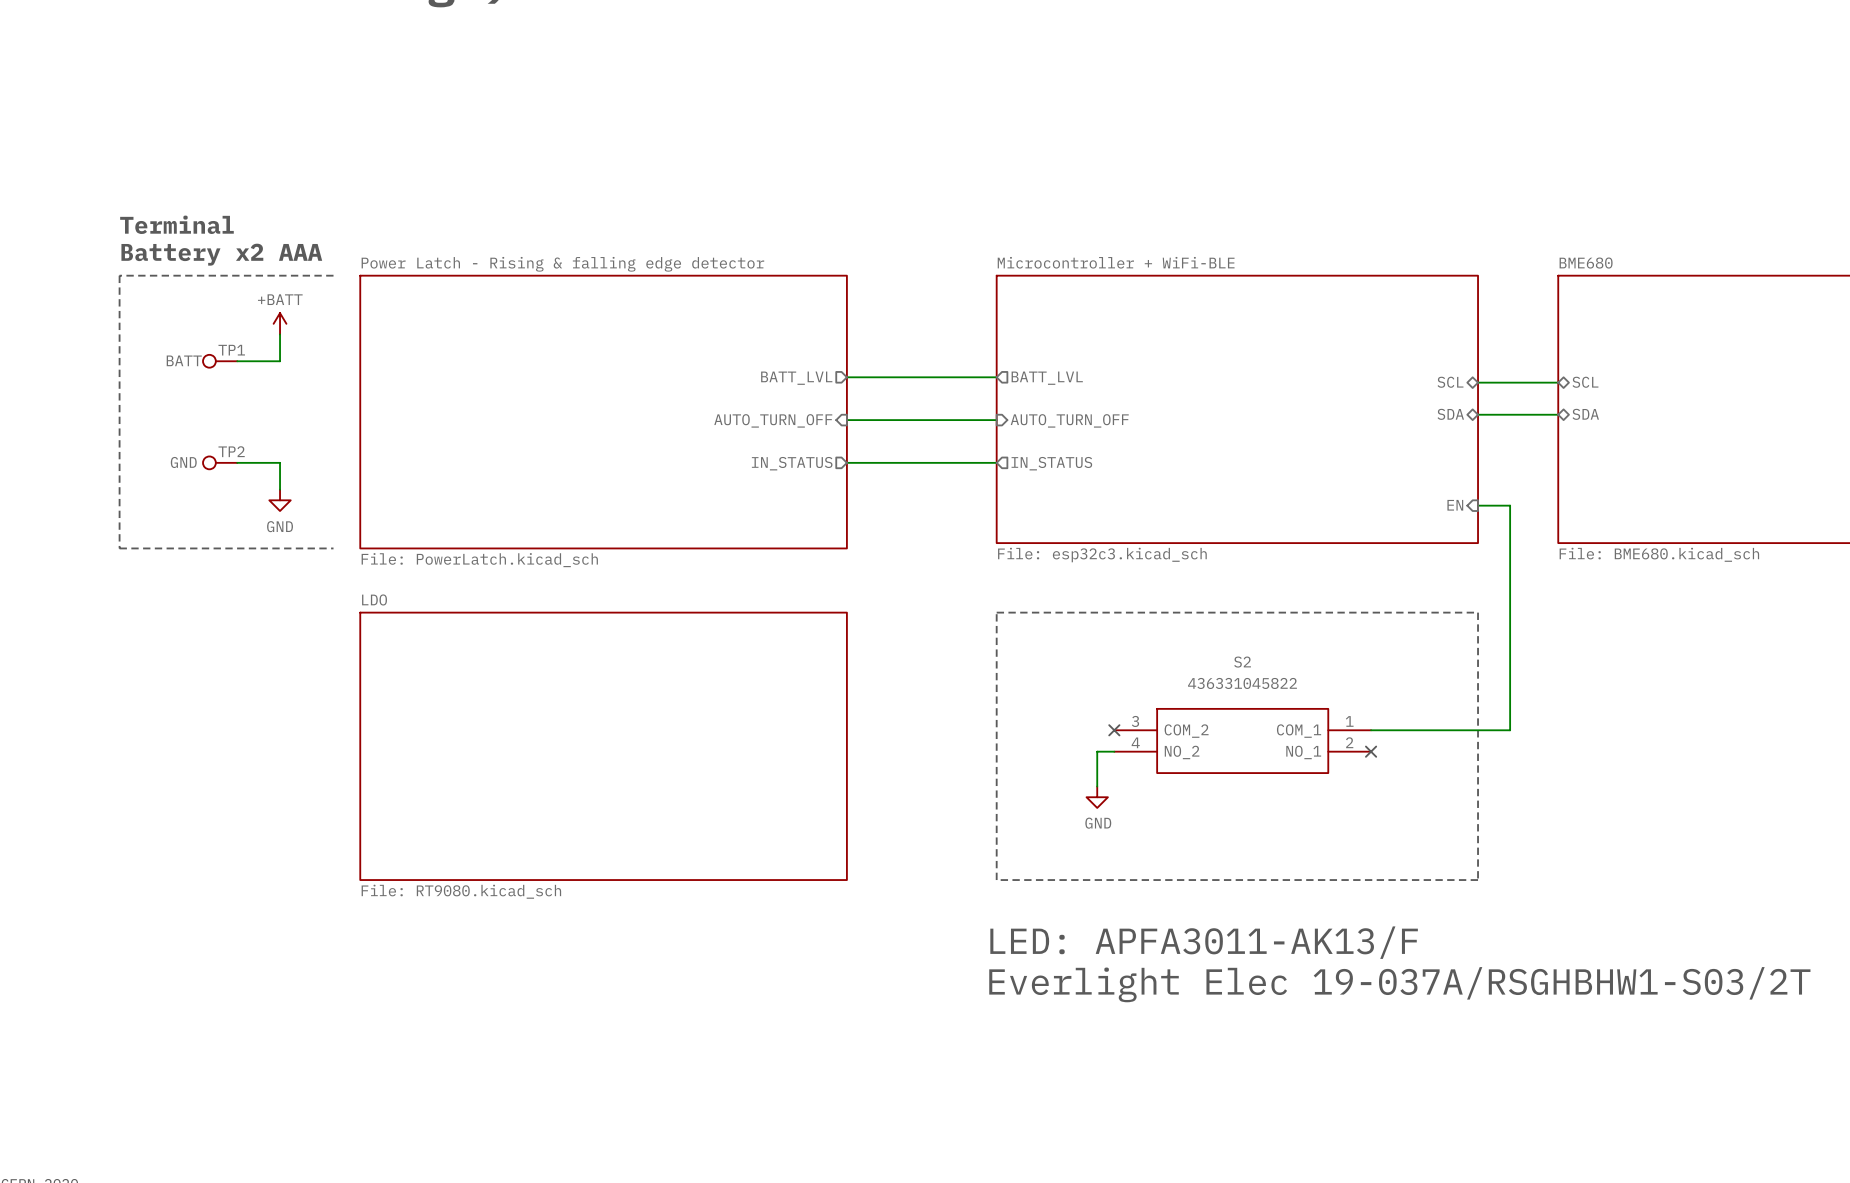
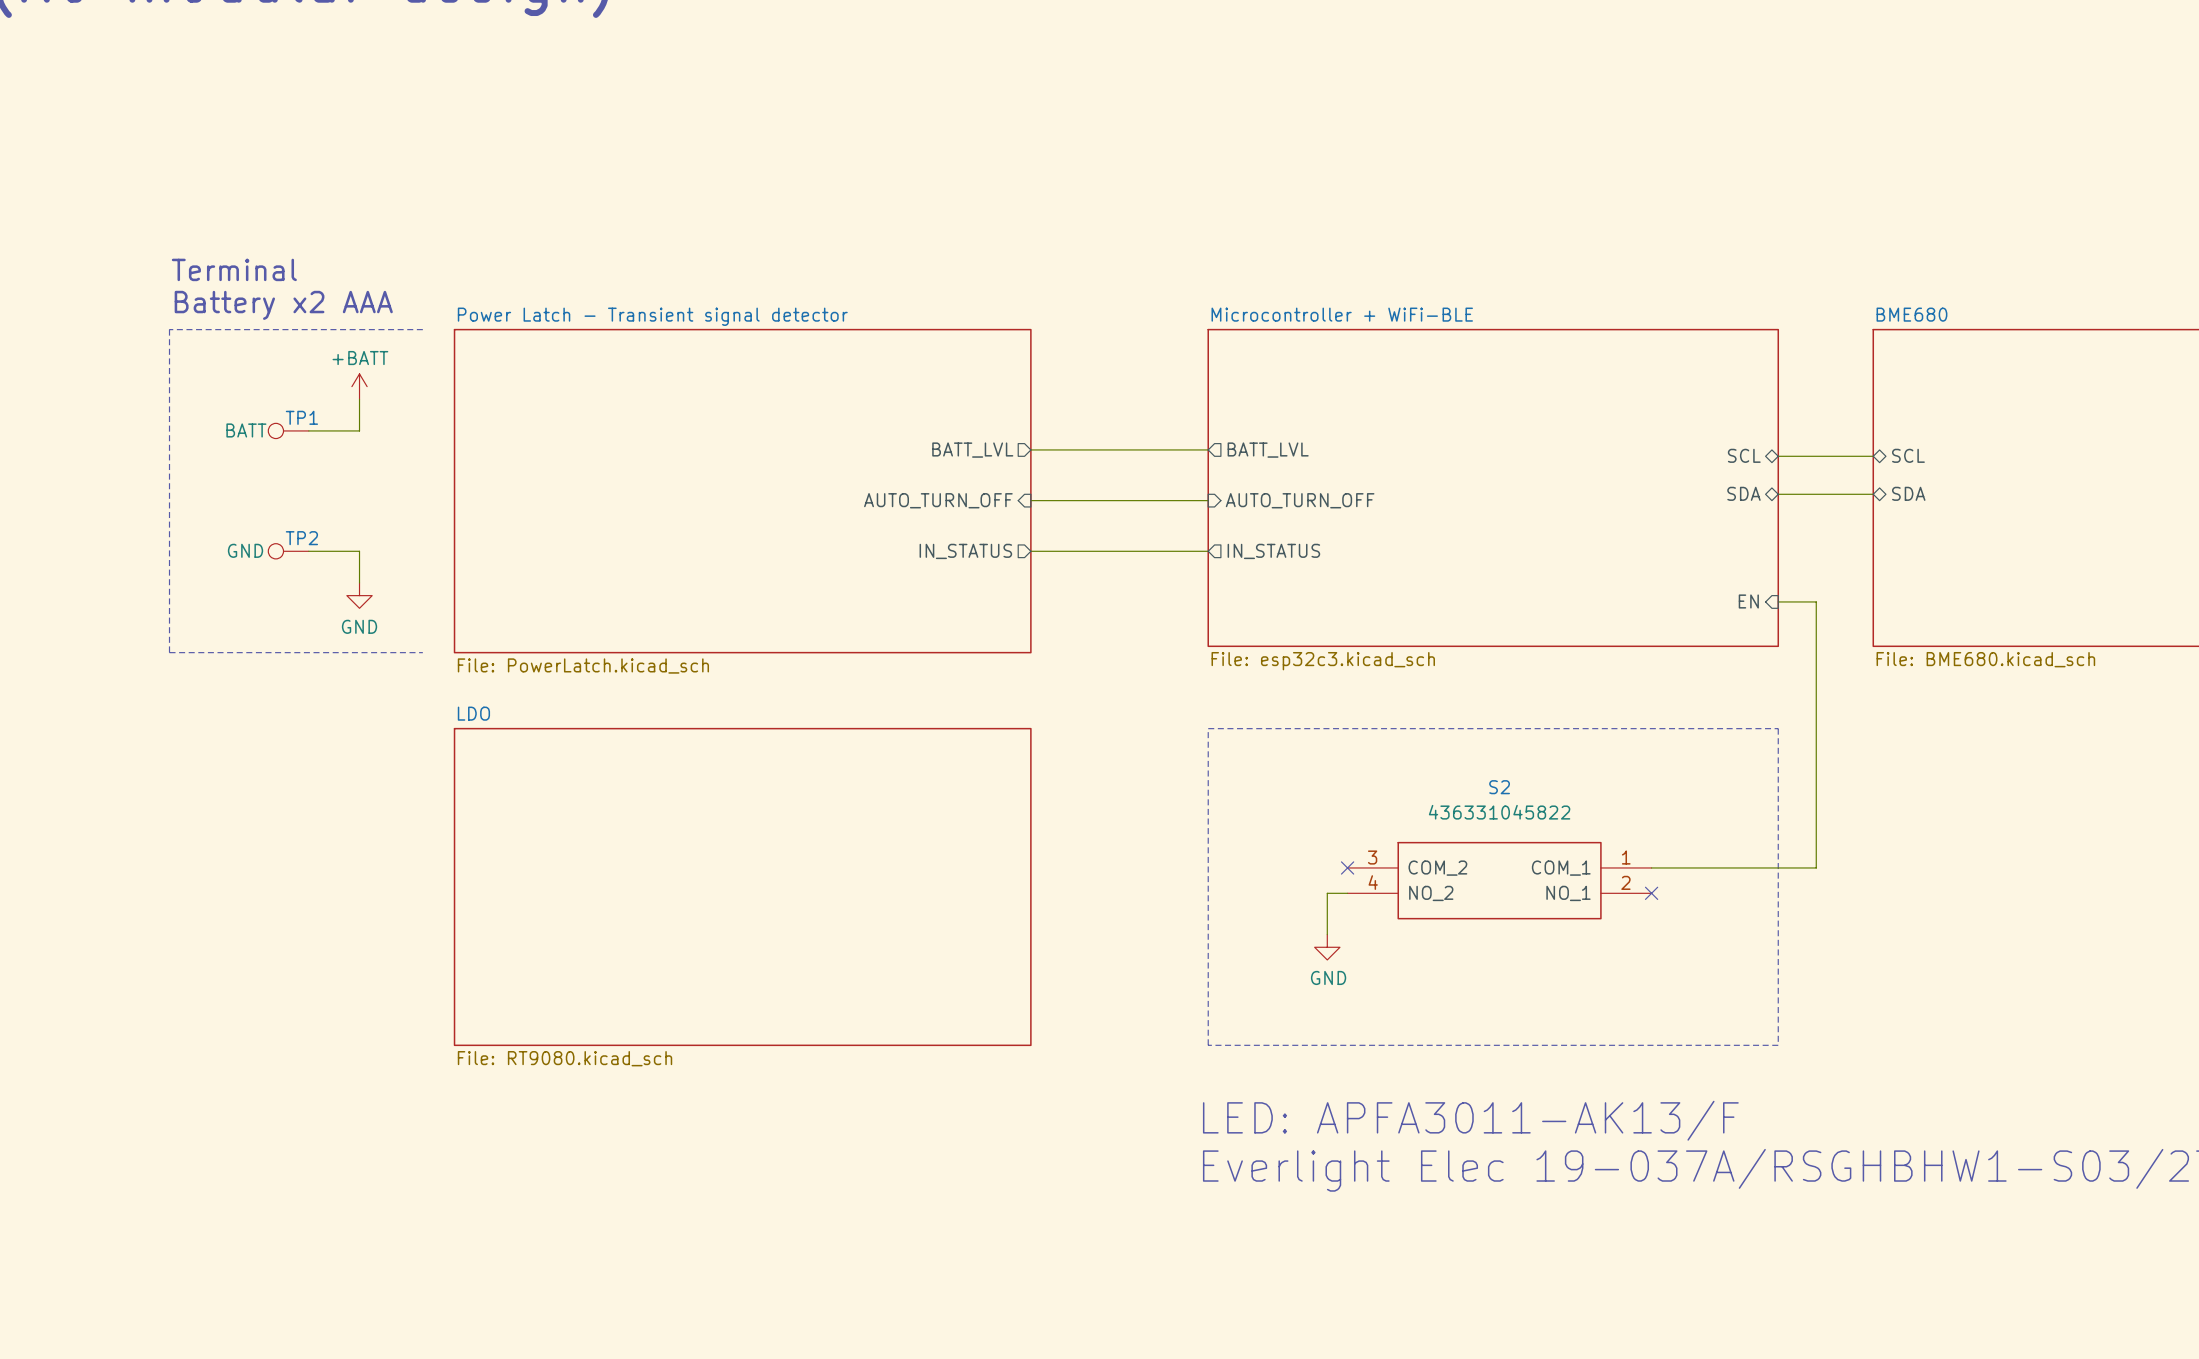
sheet Power Latch - Rising & falling edge detector name: Power Latch - Rising & falling edge detector (562, 264) -> Power Latch - Transient signal detector (652, 316)

